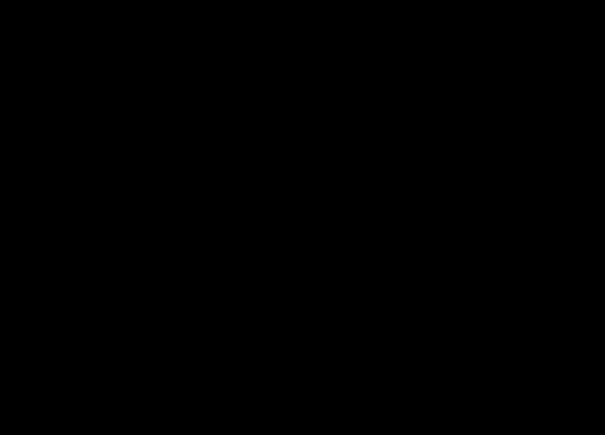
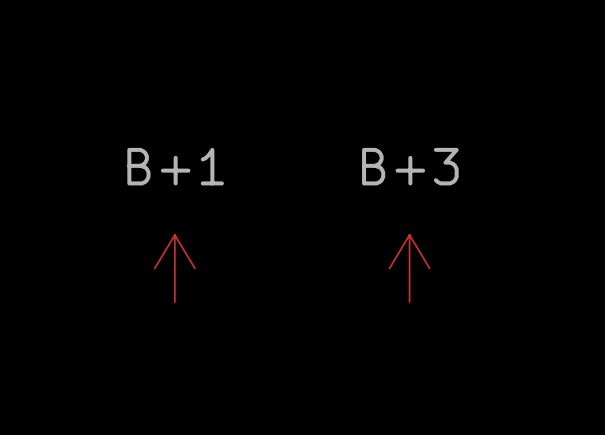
power symbol: none -> B+1 (174, 268)
power symbol: none -> B+3 (409, 268)

